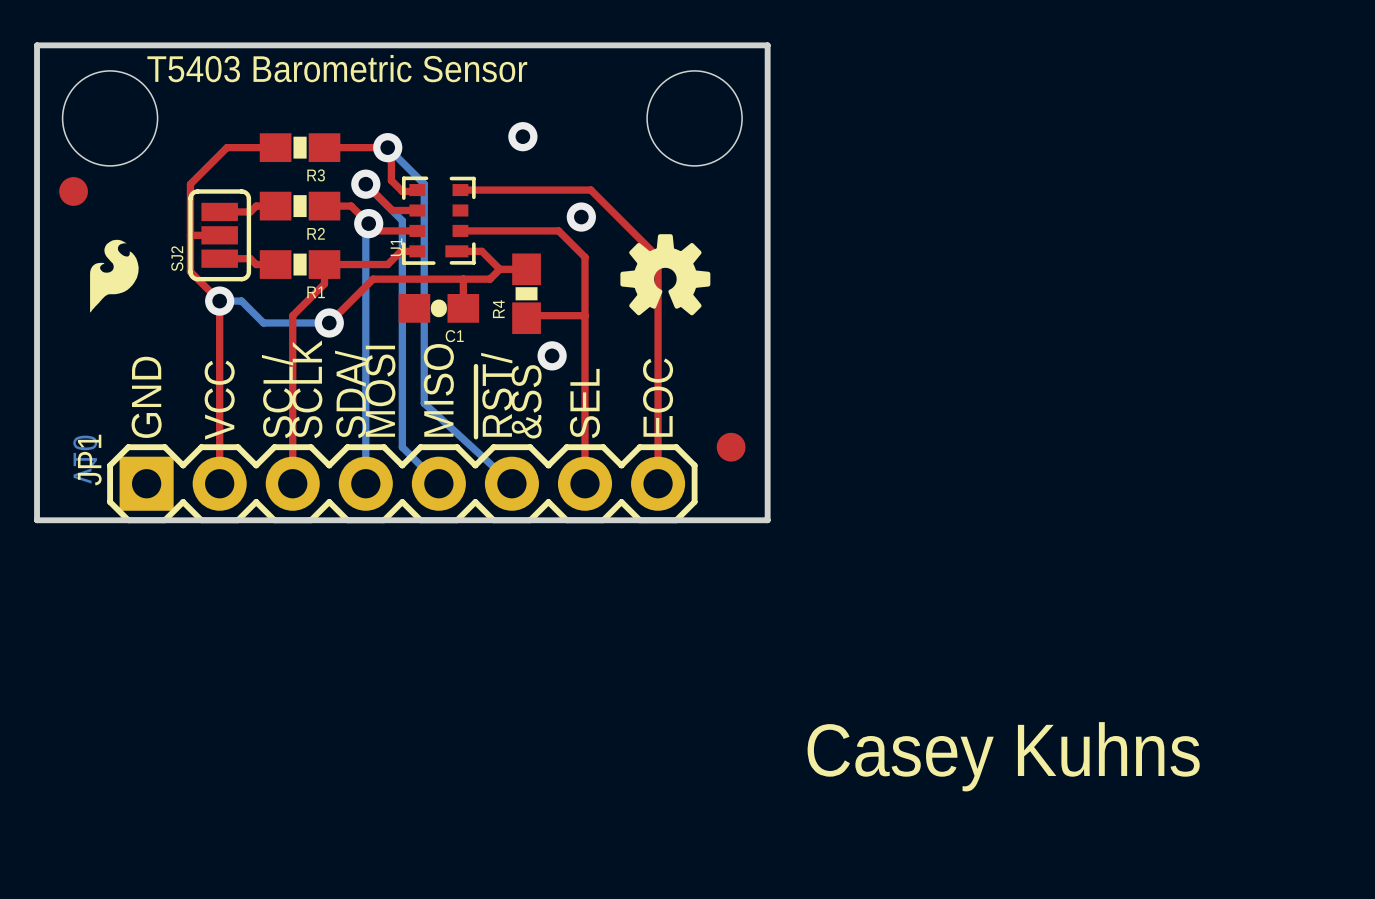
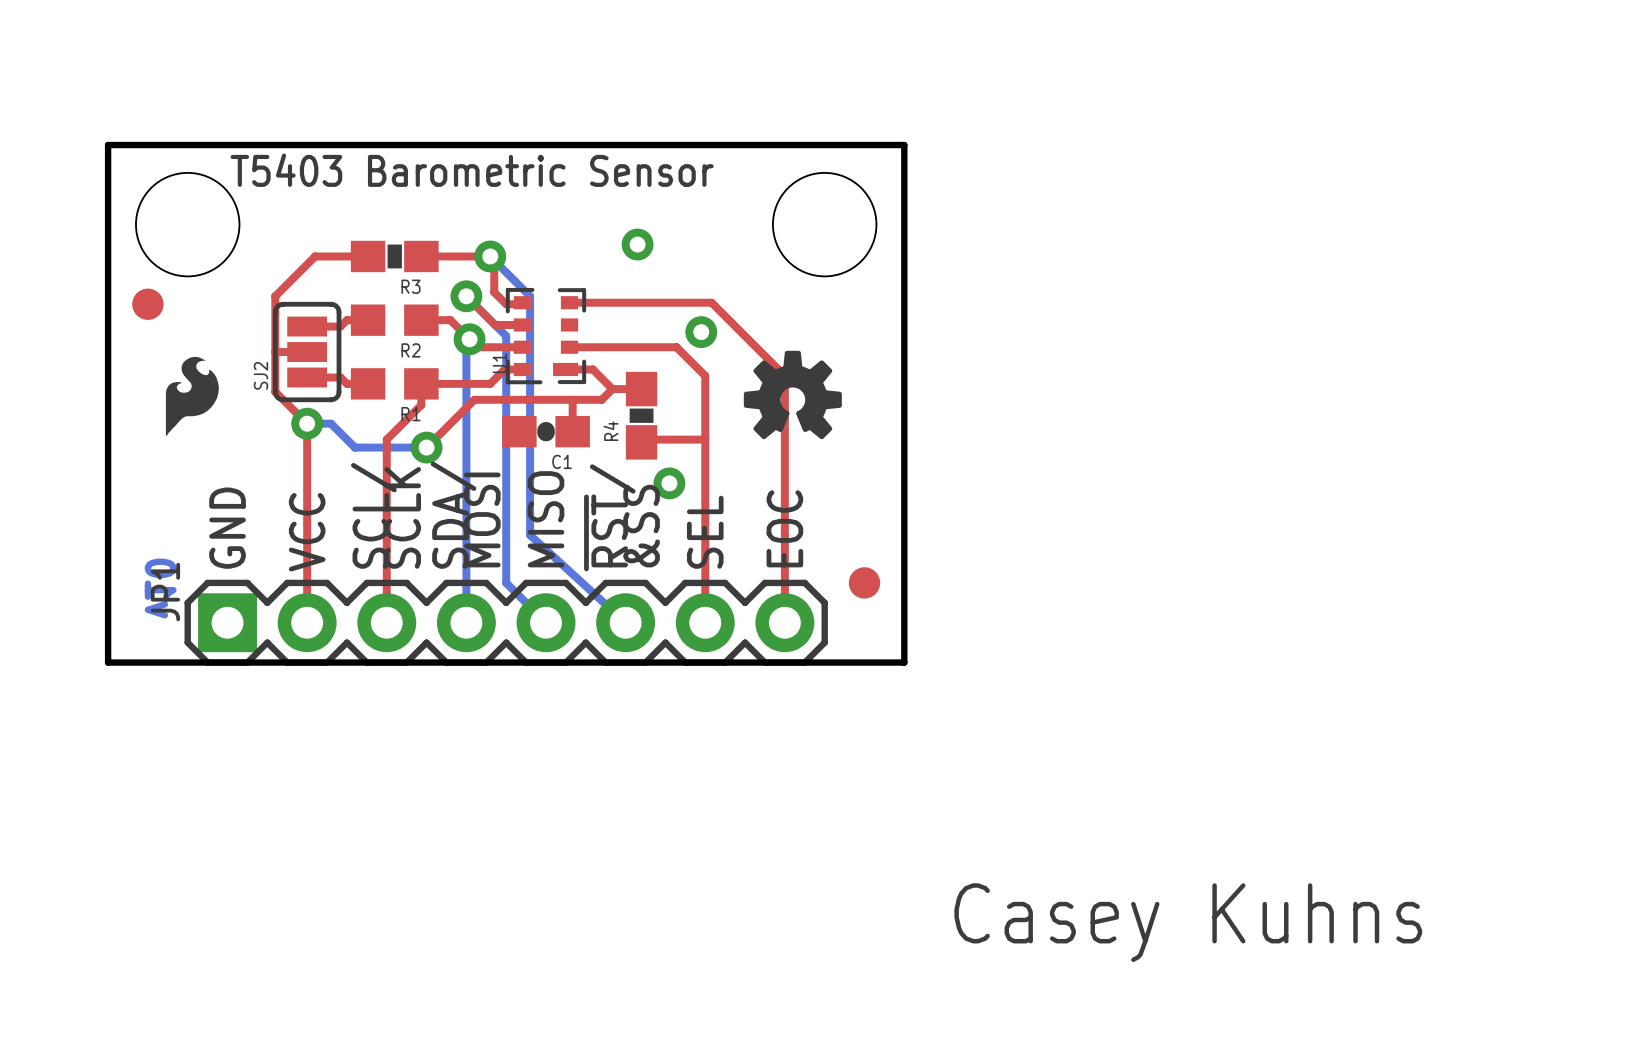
R2 footprint: [259, 191, 341, 221] -> [350, 304, 439, 336]
R1 footprint: [259, 250, 341, 279] -> [350, 368, 439, 400]

